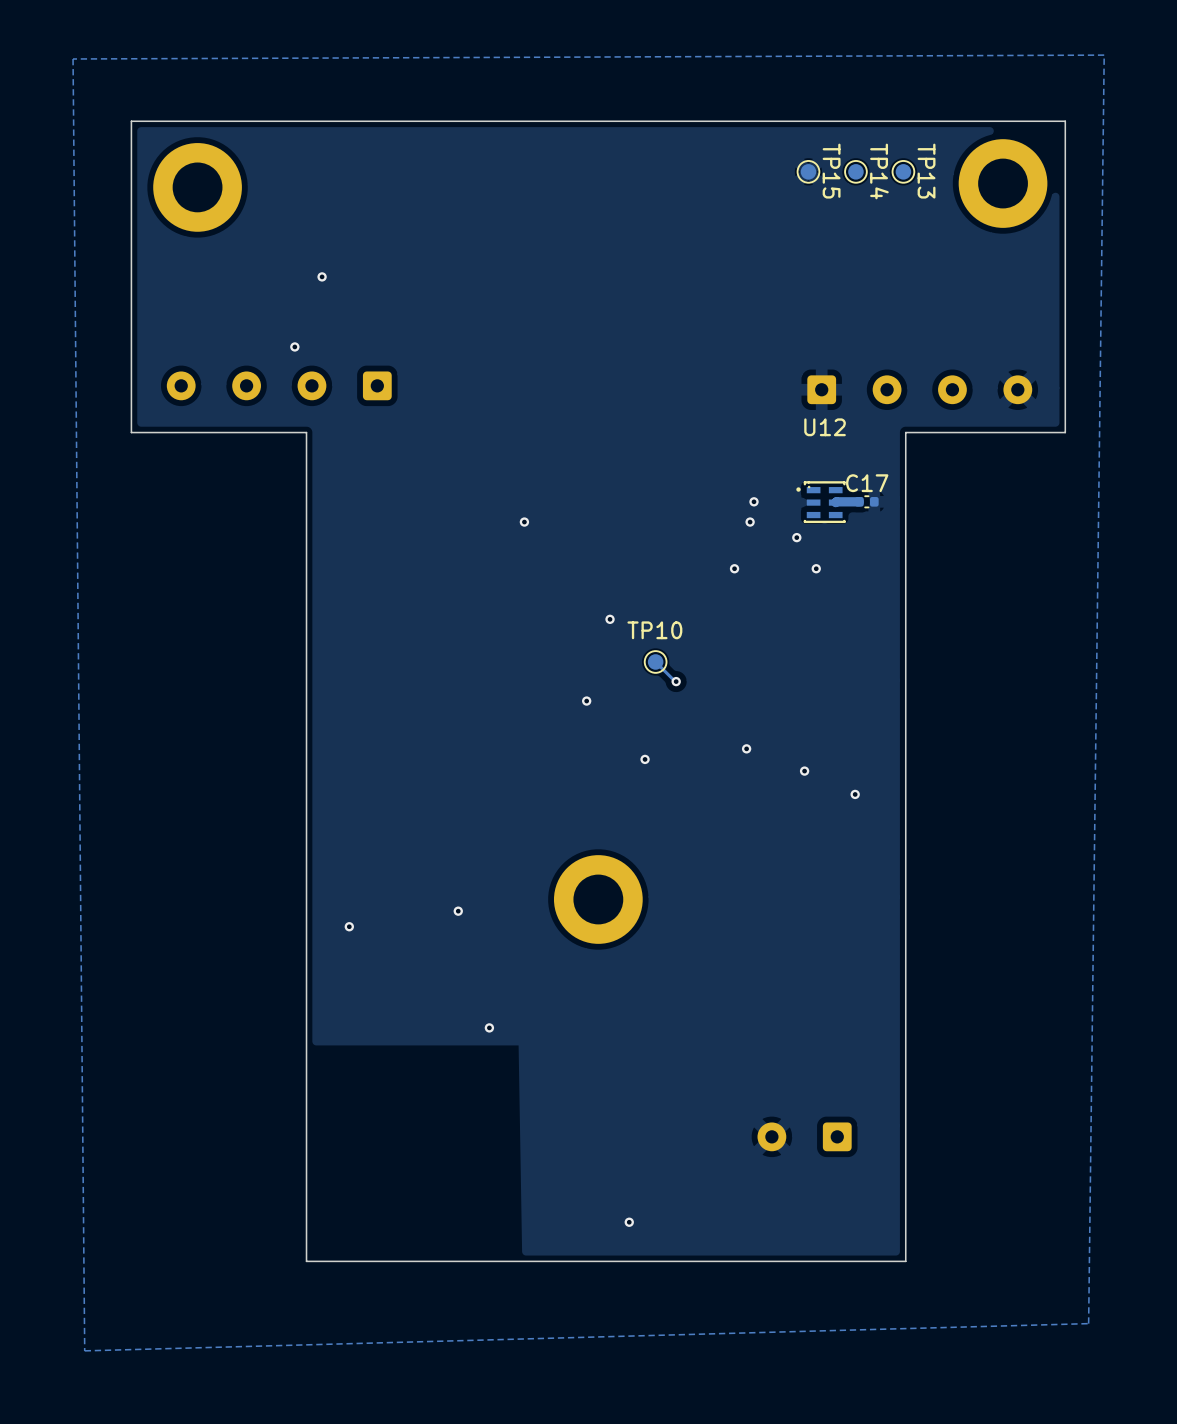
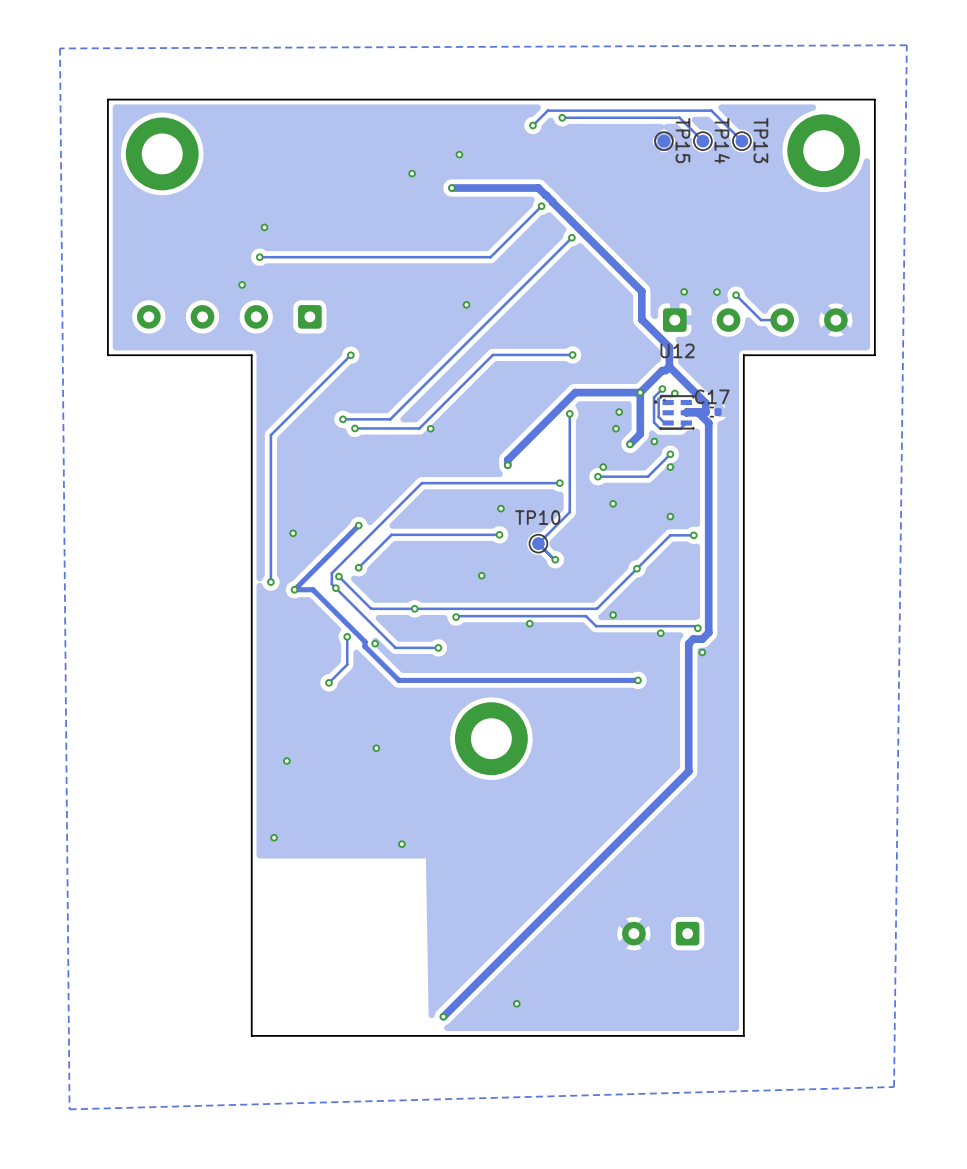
track: none -> (562, 117) (679, 117) (702, 141)
via: none -> (562, 117)
track: none -> (532, 125) (547, 110) (711, 110) (741, 141)
via: none -> (532, 125)
via: none -> (459, 154)
via: none -> (412, 173)
track: none -> (451, 188) (538, 188) (641, 291) (641, 319) (669, 347) (669, 366)
via: none -> (451, 188)
track: none -> (541, 206) (490, 257) (259, 257)
via: none -> (541, 206)
track: none -> (571, 237) (390, 419) (343, 419)
via: none -> (571, 237)
via: none -> (259, 257)
via: none -> (684, 291)
via: none -> (717, 292)
track: none -> (736, 295) (761, 320) (782, 320)
via: none -> (736, 295)
via: none -> (466, 304)
track: none -> (350, 355) (270, 435) (270, 582)
via: none -> (350, 355)
track: none -> (572, 354) (492, 354) (419, 428) (354, 428)
via: none -> (572, 354)
track: none -> (669, 366) (665, 370) (662, 370) (640, 392)
track: none -> (669, 366) (705, 403) (705, 412)
track: none -> (662, 388) (654, 397) (654, 422) (660, 428) (680, 428) (686, 422)
via: none -> (662, 388)
track: none -> (640, 392) (640, 434) (630, 444)
track: none -> (640, 392) (575, 392) (507, 460) (507, 465)
via: none -> (640, 392)
track: none -> (674, 393) (672, 396) (661, 396) (658, 399) (658, 417) (664, 422) (668, 422)
via: none -> (674, 393)
track: none -> (686, 412) (698, 412) (708, 423) (708, 632) (702, 639) (693, 639) (688, 643) (688, 771) (443, 1016)
track: none -> (569, 413) (569, 512) (538, 543)
via: none -> (569, 413)
via: none -> (343, 419)
via: none -> (354, 428)
via: none -> (630, 444)
track: none -> (670, 454) (647, 476) (597, 476)
via: none -> (670, 454)
via: none -> (507, 465)
via: none -> (597, 476)
track: none -> (559, 483) (421, 483) (331, 573) (331, 584) (395, 647) (438, 647)
via: none -> (559, 483)
via: none -> (613, 503)
via: none -> (670, 516)
track: none -> (358, 525) (294, 589) (312, 589) (365, 641) (365, 646) (398, 680) (637, 680)
via: none -> (358, 525)
via: none -> (293, 533)
track: none -> (499, 534) (391, 534) (358, 567)
via: none -> (499, 534)
track: none -> (693, 535) (670, 535) (596, 608) (371, 608) (338, 576)
via: none -> (693, 535)
via: none -> (358, 567)
via: none -> (636, 568)
via: none -> (338, 576)
via: none -> (270, 582)
via: none -> (335, 588)
via: none -> (294, 589)
via: none -> (414, 608)
track: none -> (456, 617) (586, 616) (596, 626) (695, 626) (697, 628)
via: none -> (456, 617)
via: none -> (697, 628)
track: none -> (347, 636) (347, 664) (329, 682)
via: none -> (347, 636)
via: none -> (375, 643)
via: none -> (438, 647)
via: none -> (637, 680)
via: none -> (329, 682)
via: none -> (274, 837)
via: none -> (443, 1016)

